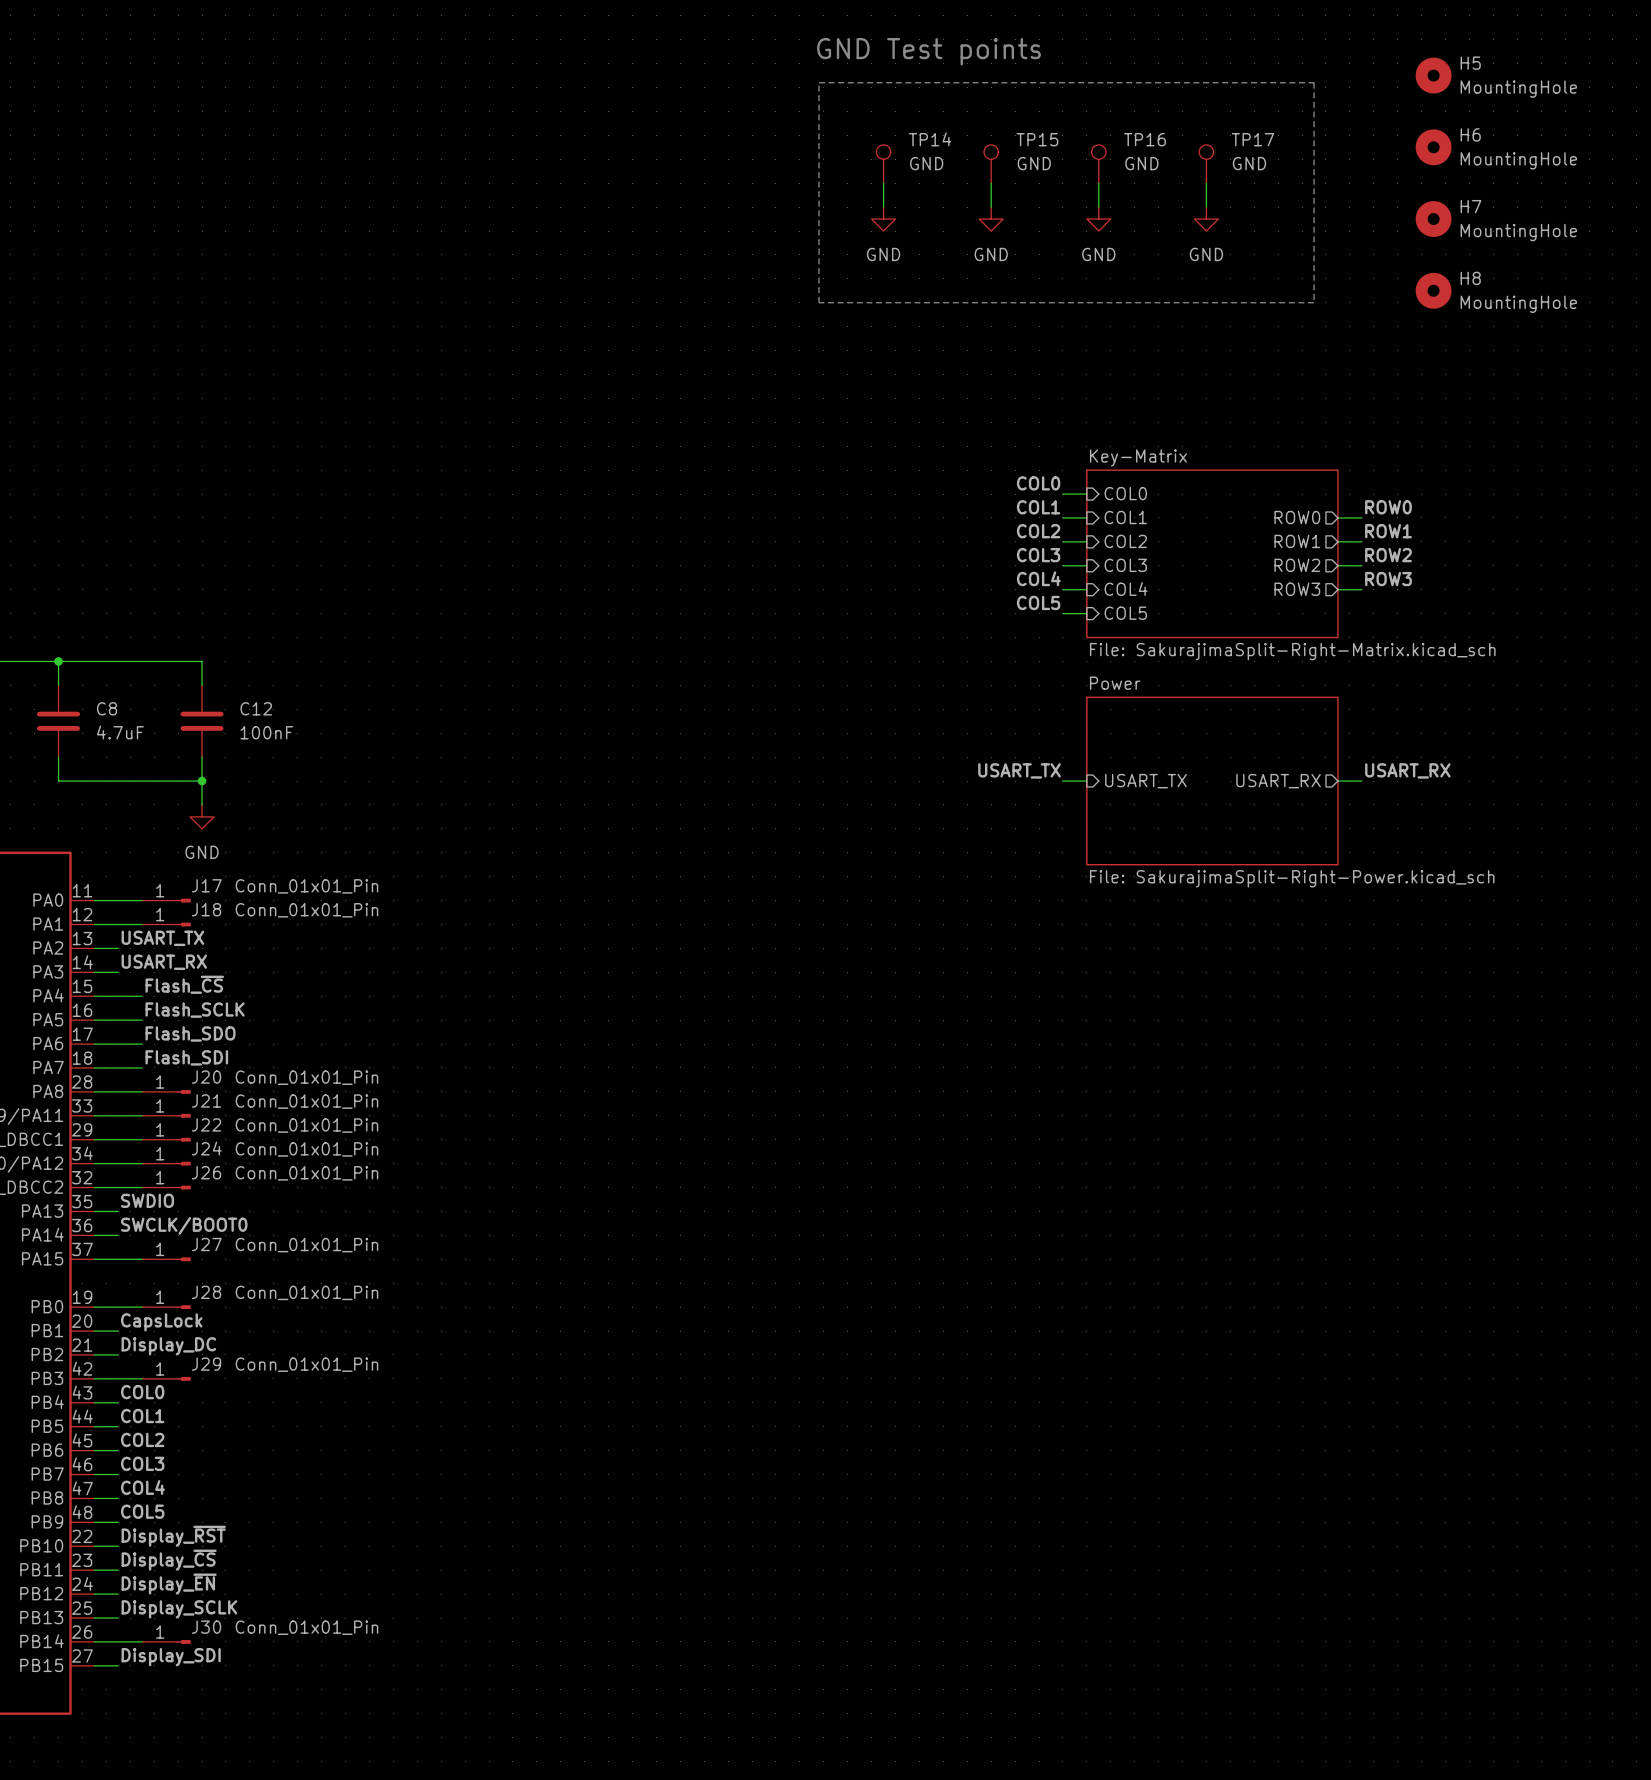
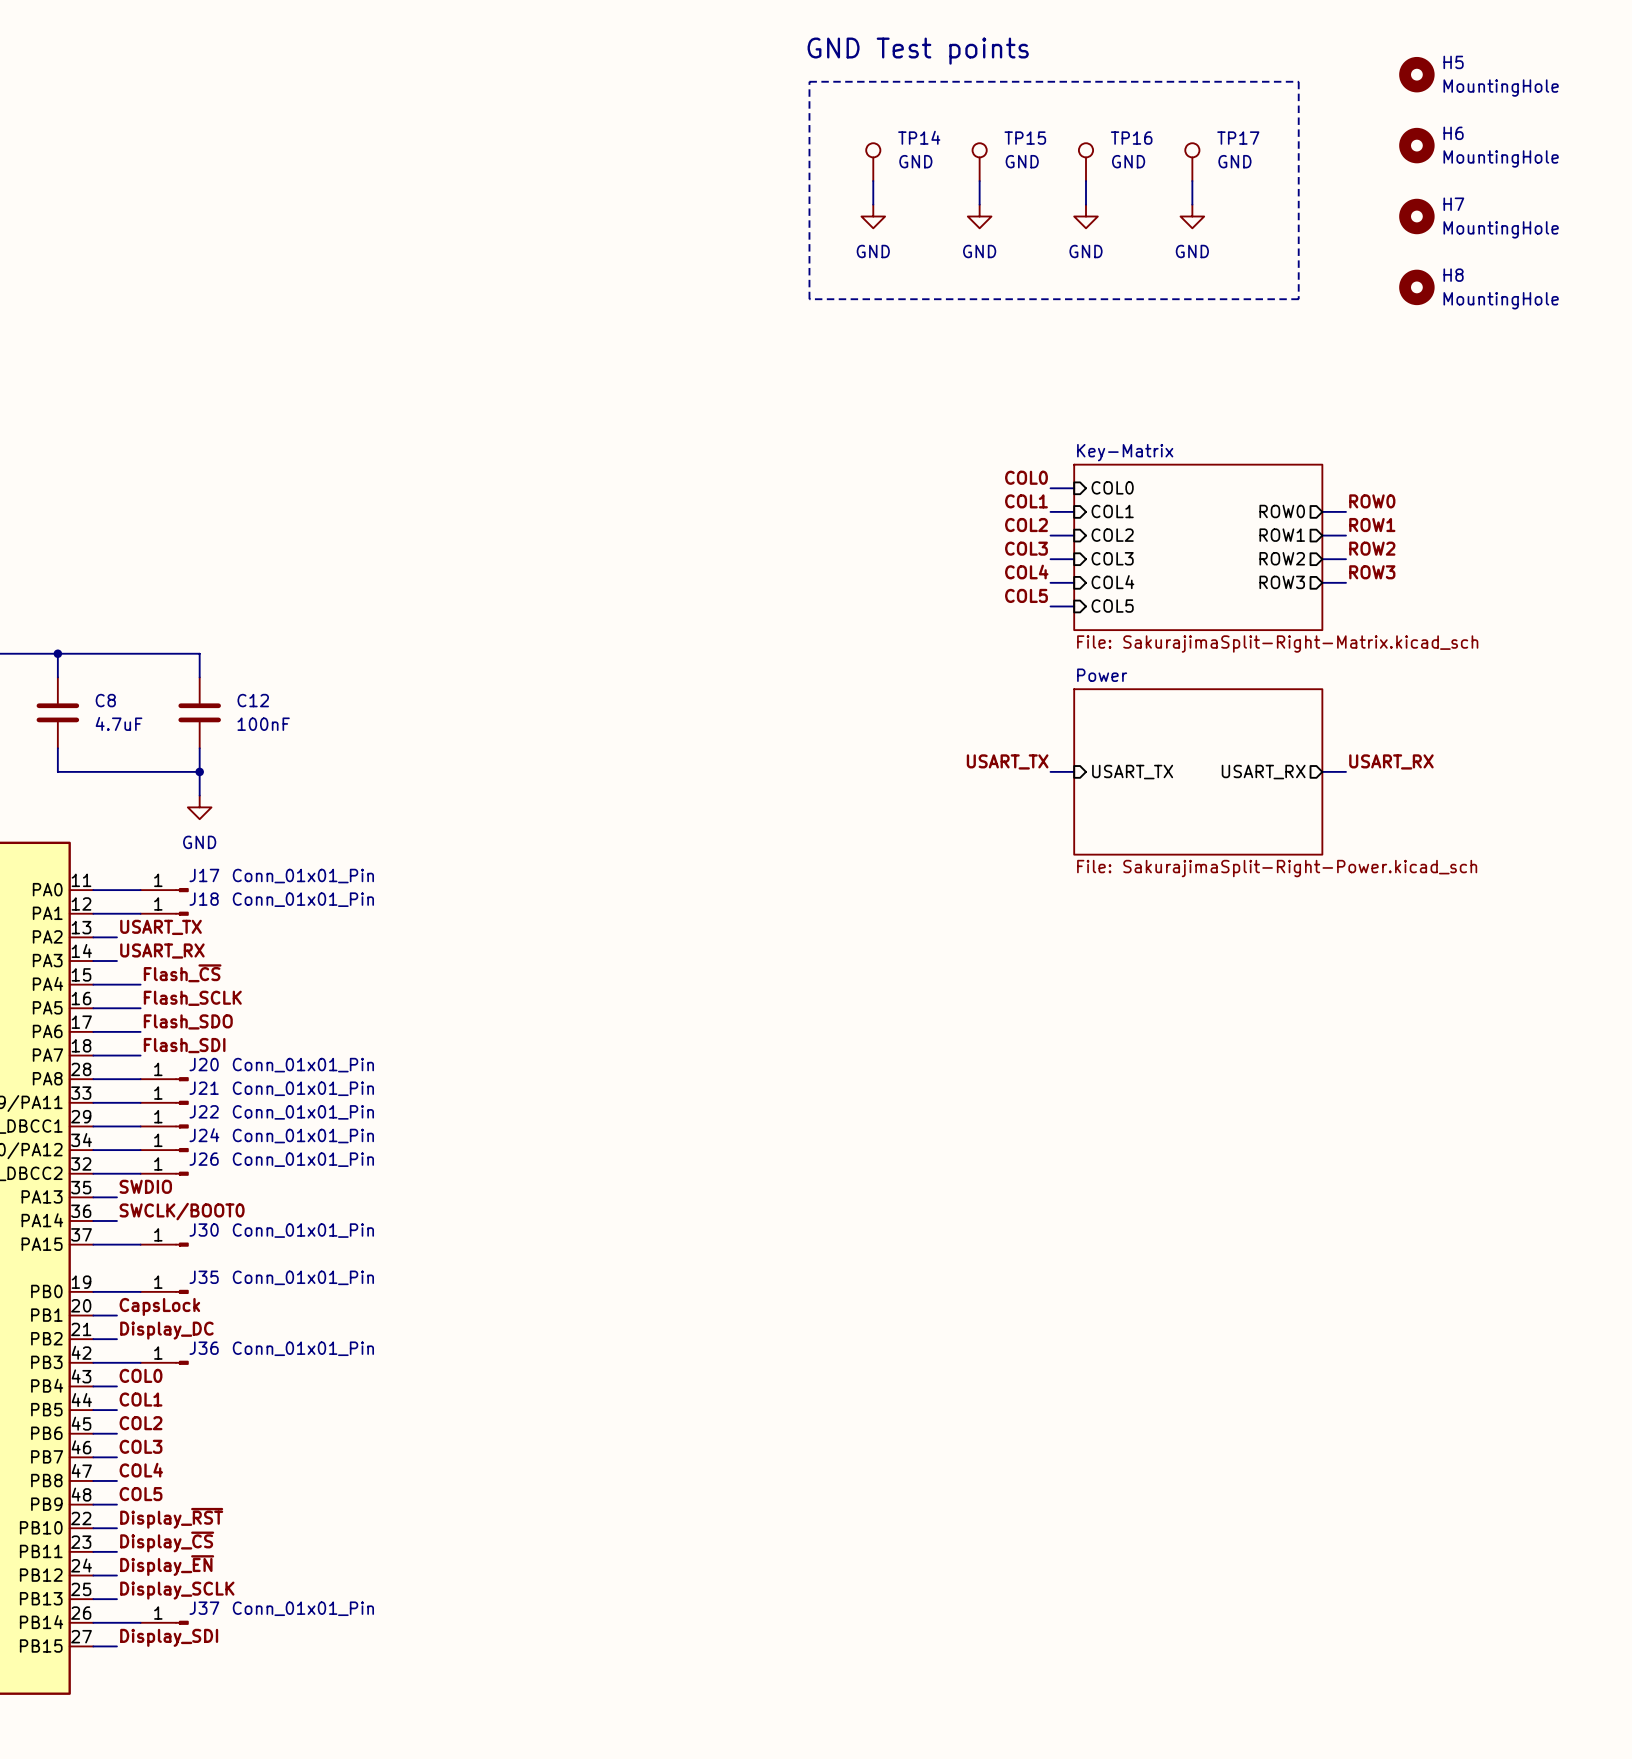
J27 name: J27 (206, 1244) -> J30 (204, 1230)
J28 name: J28 (206, 1292) -> J35 (204, 1277)
J29 name: J29 (206, 1364) -> J36 (204, 1348)
J30 name: J30 (206, 1627) -> J37 (204, 1608)

